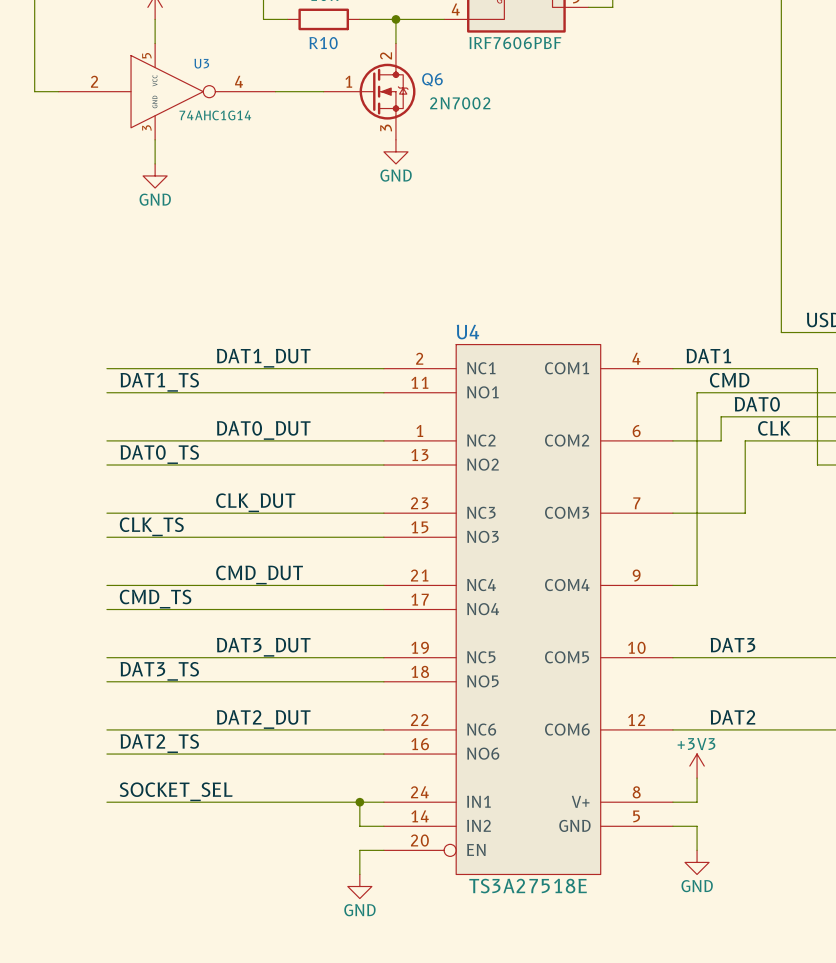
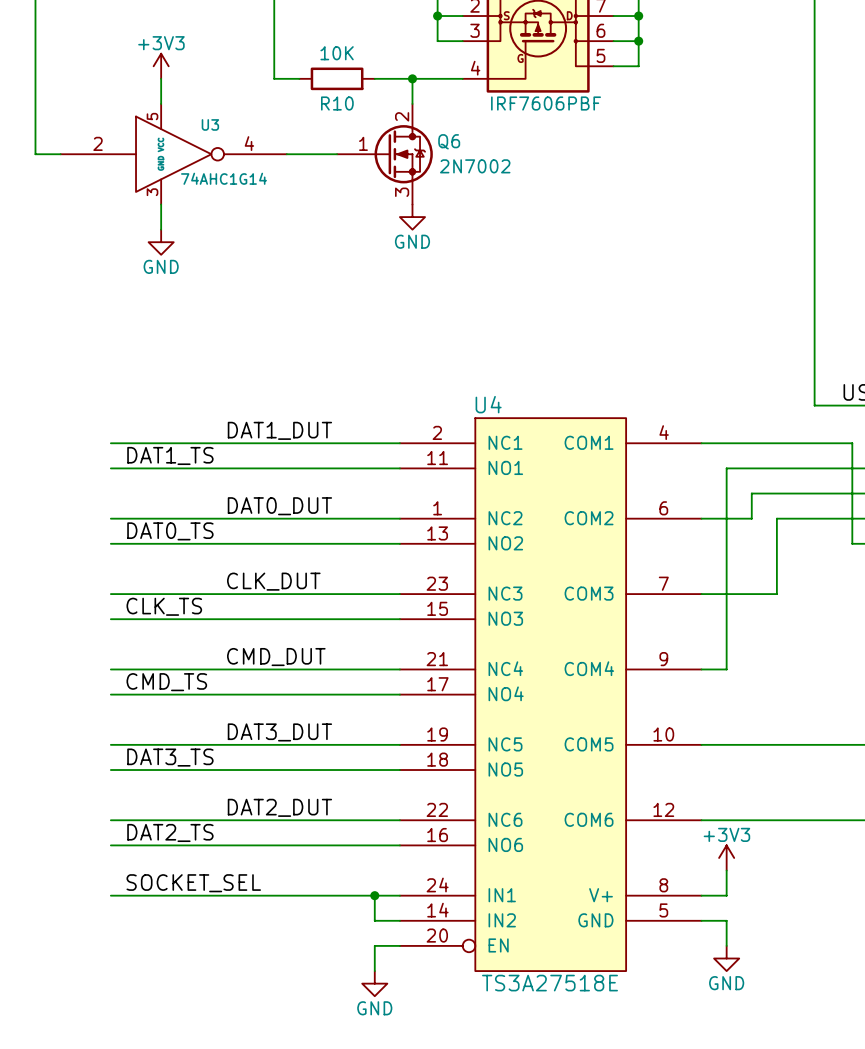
label: DAT1 (708, 356) -> none
label: CMD (729, 380) -> none
label: DAT0 (757, 404) -> none
label: CLK (774, 428) -> none
label: DAT3 (732, 645) -> none
label: DAT2 (732, 717) -> none

